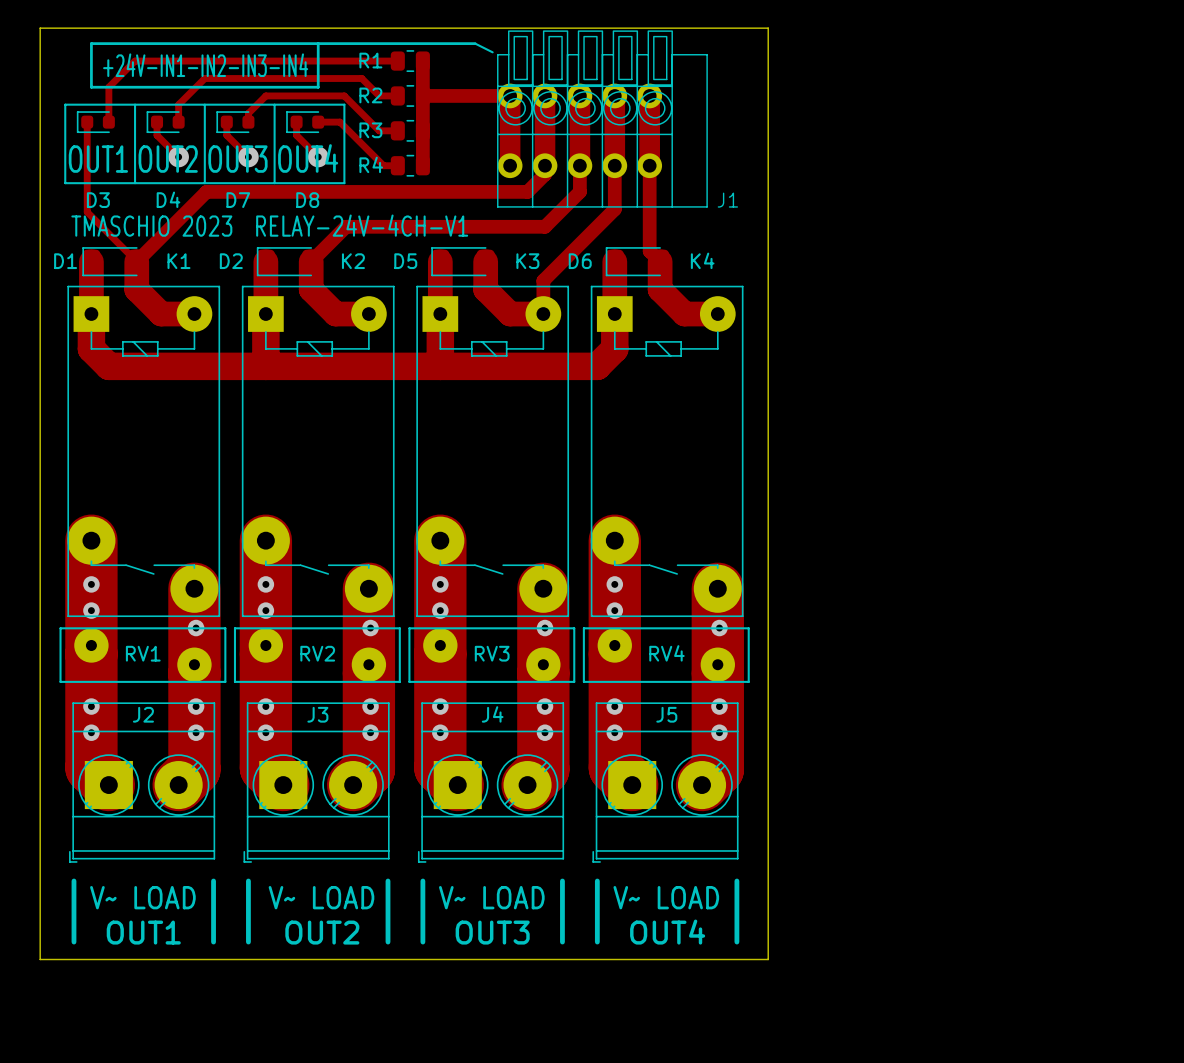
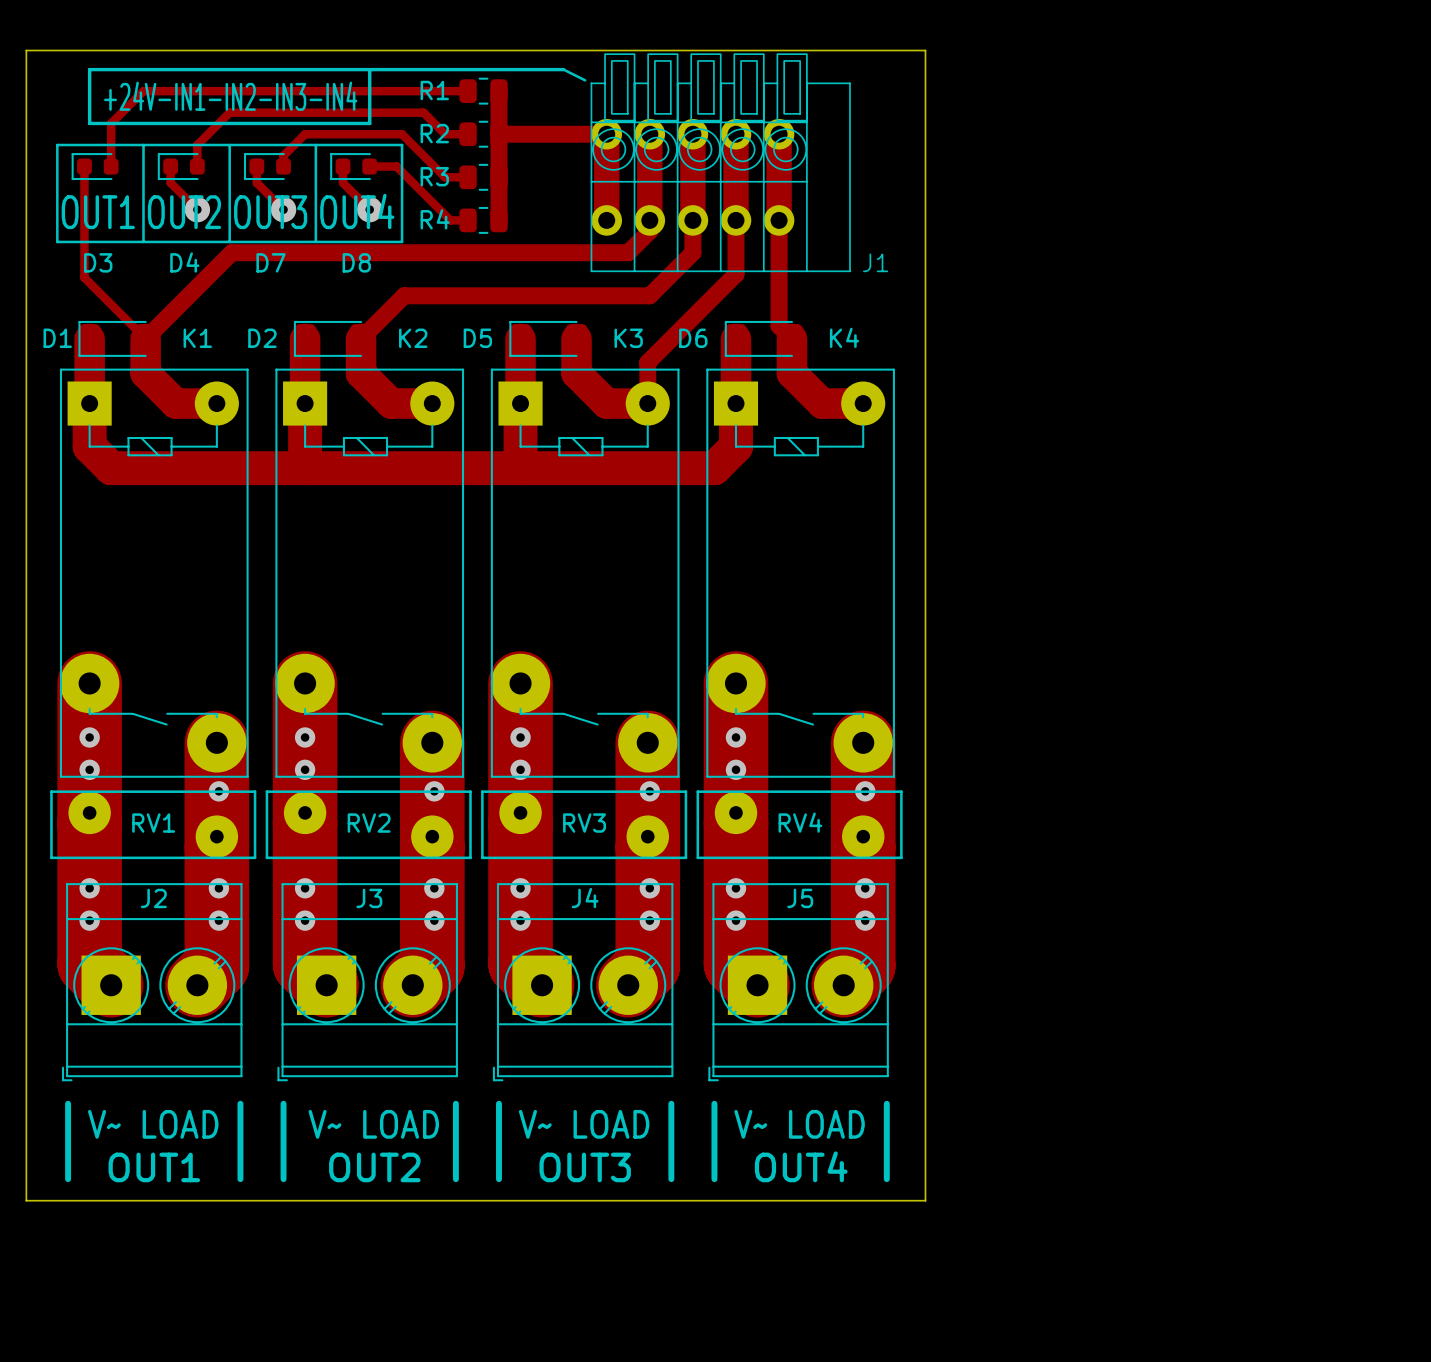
text: RELAY-24V-4CH-V1 (362, 225) -> none
text: TMASCHIO 2023 (151, 226) -> none

